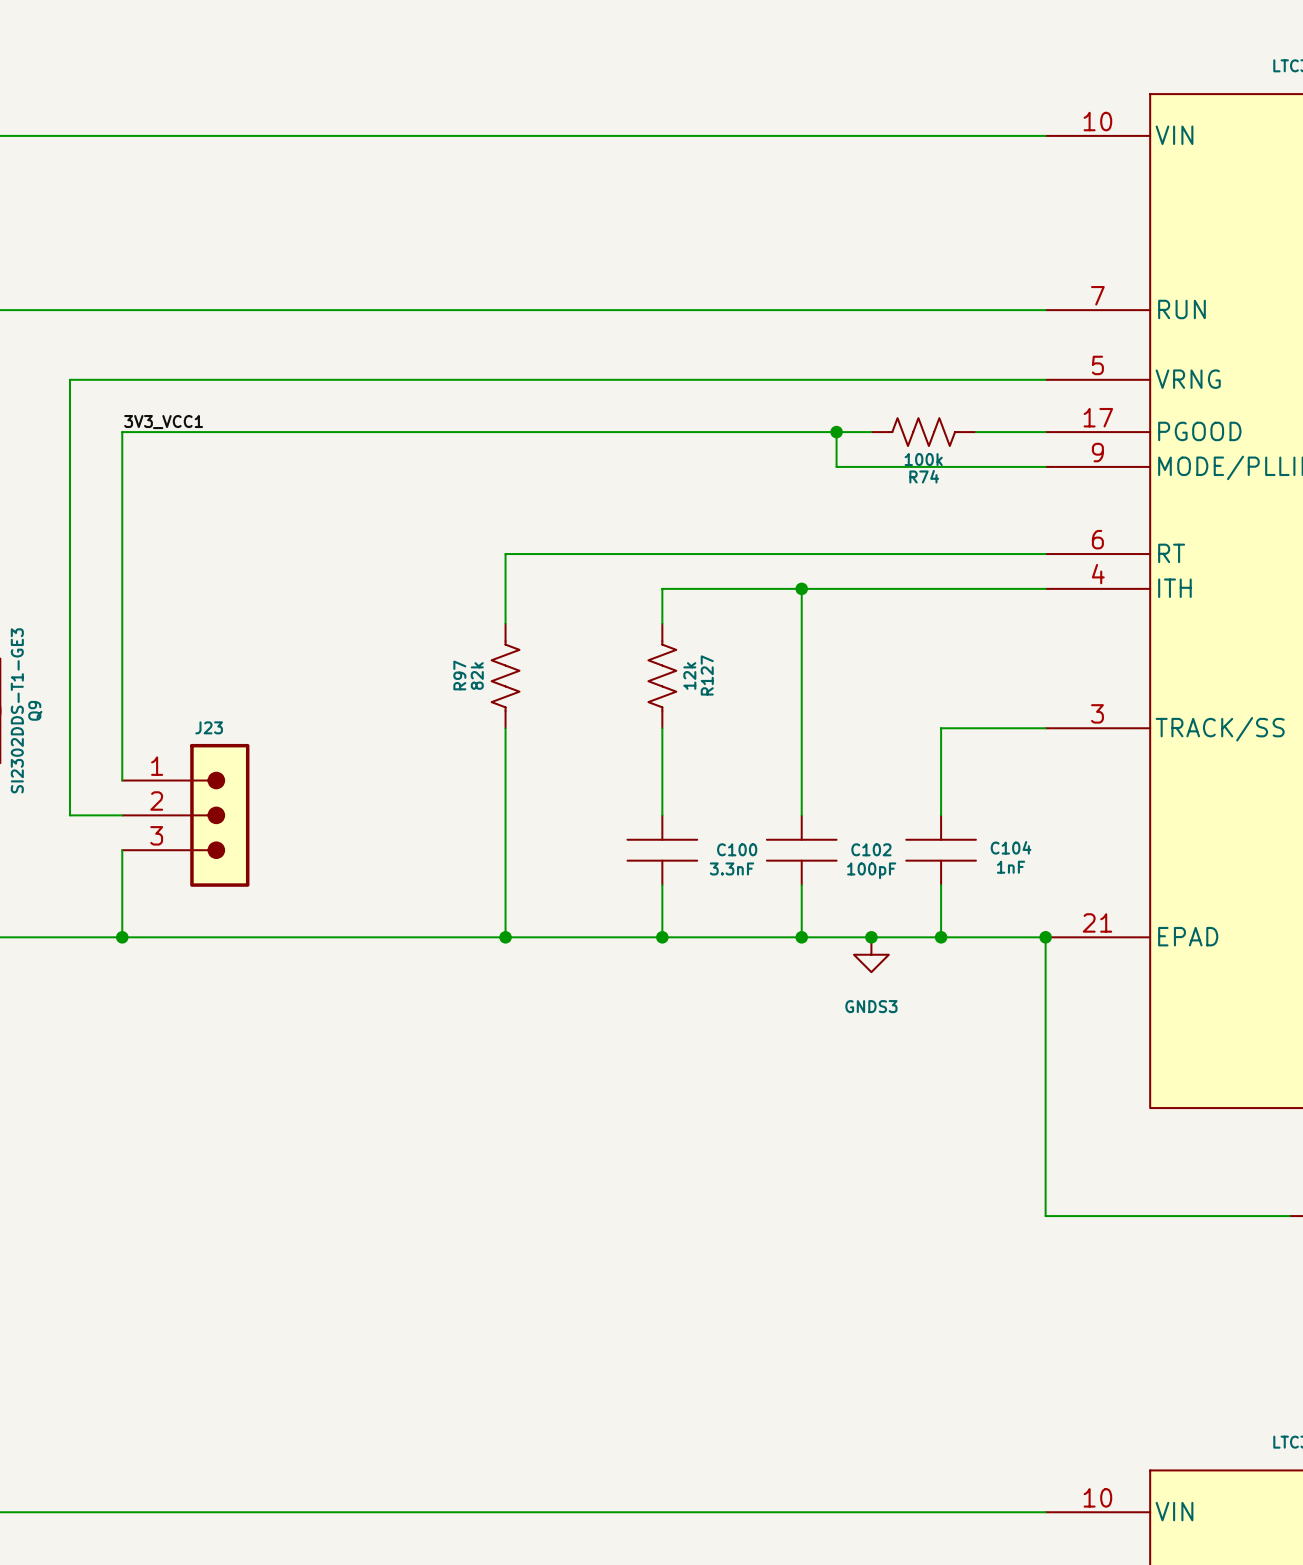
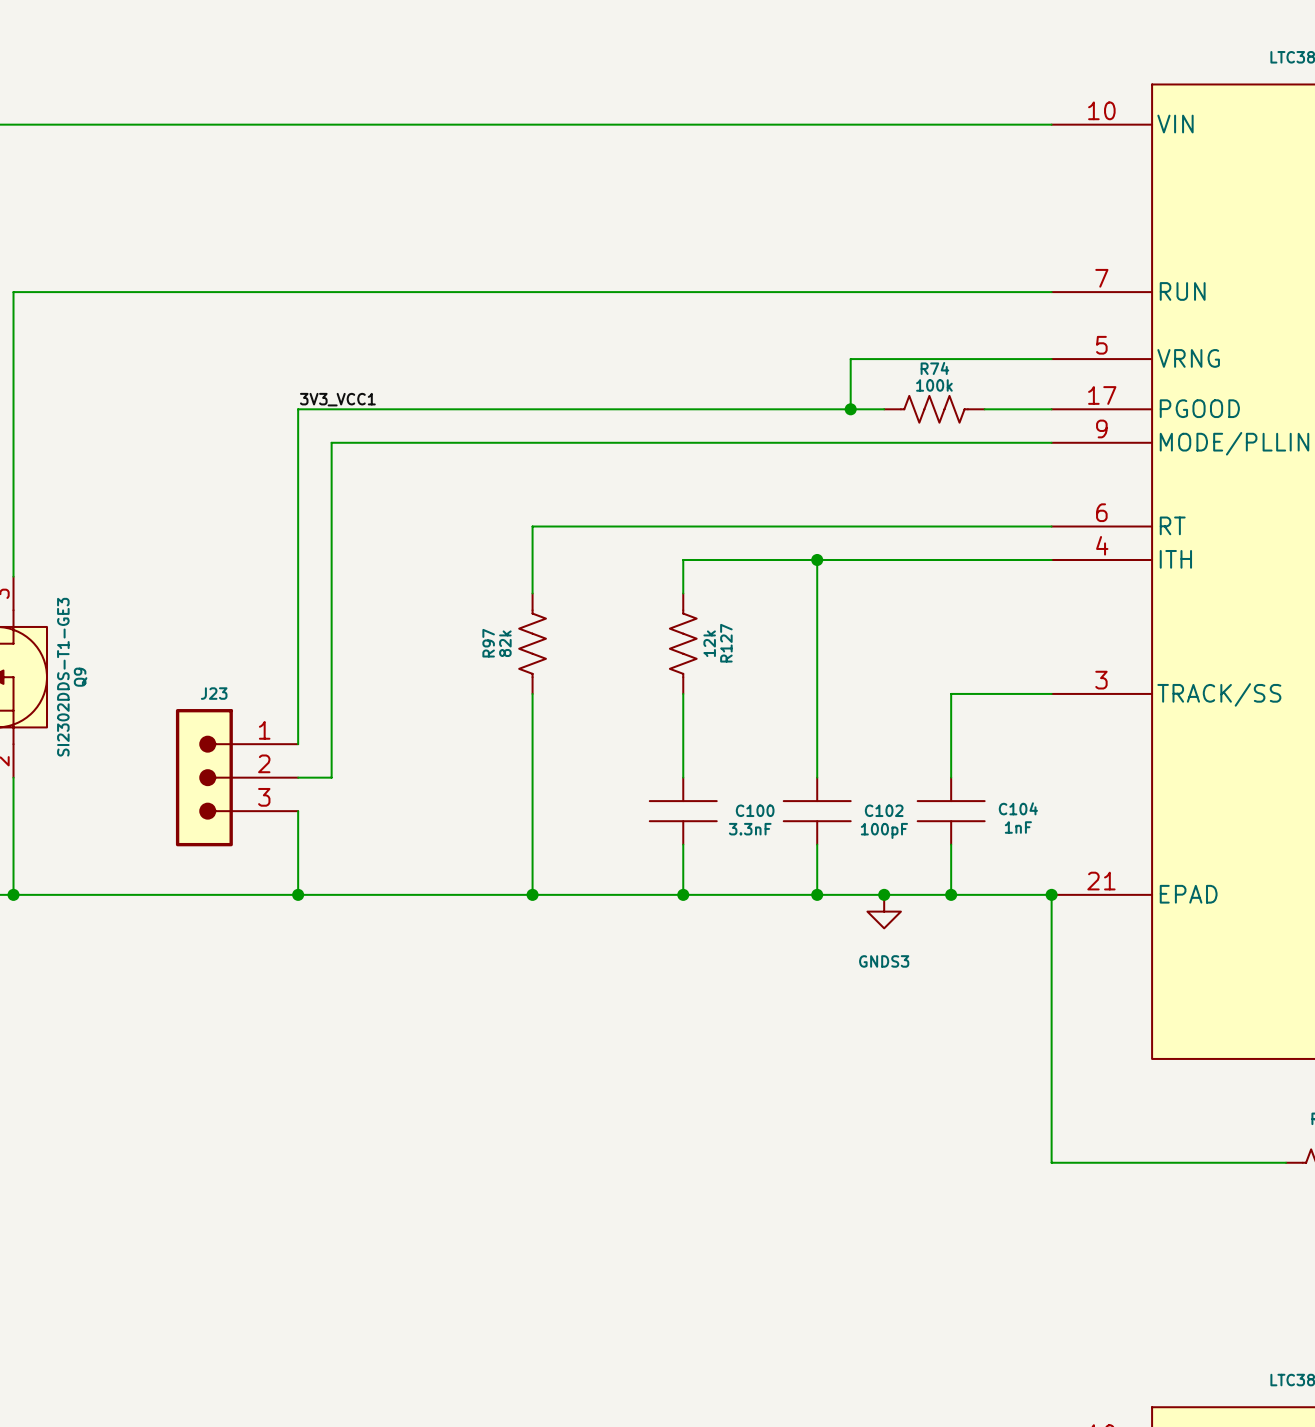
wire: (836, 379) (70, 379) (70, 815) (122, 815) -> none
label position: 3V3_VCC1 (163, 422) -> 3V3_VCC1 (337, 399)
wire: (261, 432) (122, 432) (122, 780) -> (298, 409) (298, 744)
wire: (836, 432) (836, 466) -> (850, 409) (850, 359)
R74 value position: 100k (923, 459) -> 100k (934, 385)
wire: none -> (850, 442) (331, 442) (331, 777) (298, 777)
R74 name position: R74 (924, 476) -> R74 (934, 368)
J23 flip: as is (219, 815) -> left-right (204, 777)
wire: (122, 850) (122, 937) -> (298, 811) (298, 894)
junction: (122, 937) -> none
junction: none -> (298, 894)

